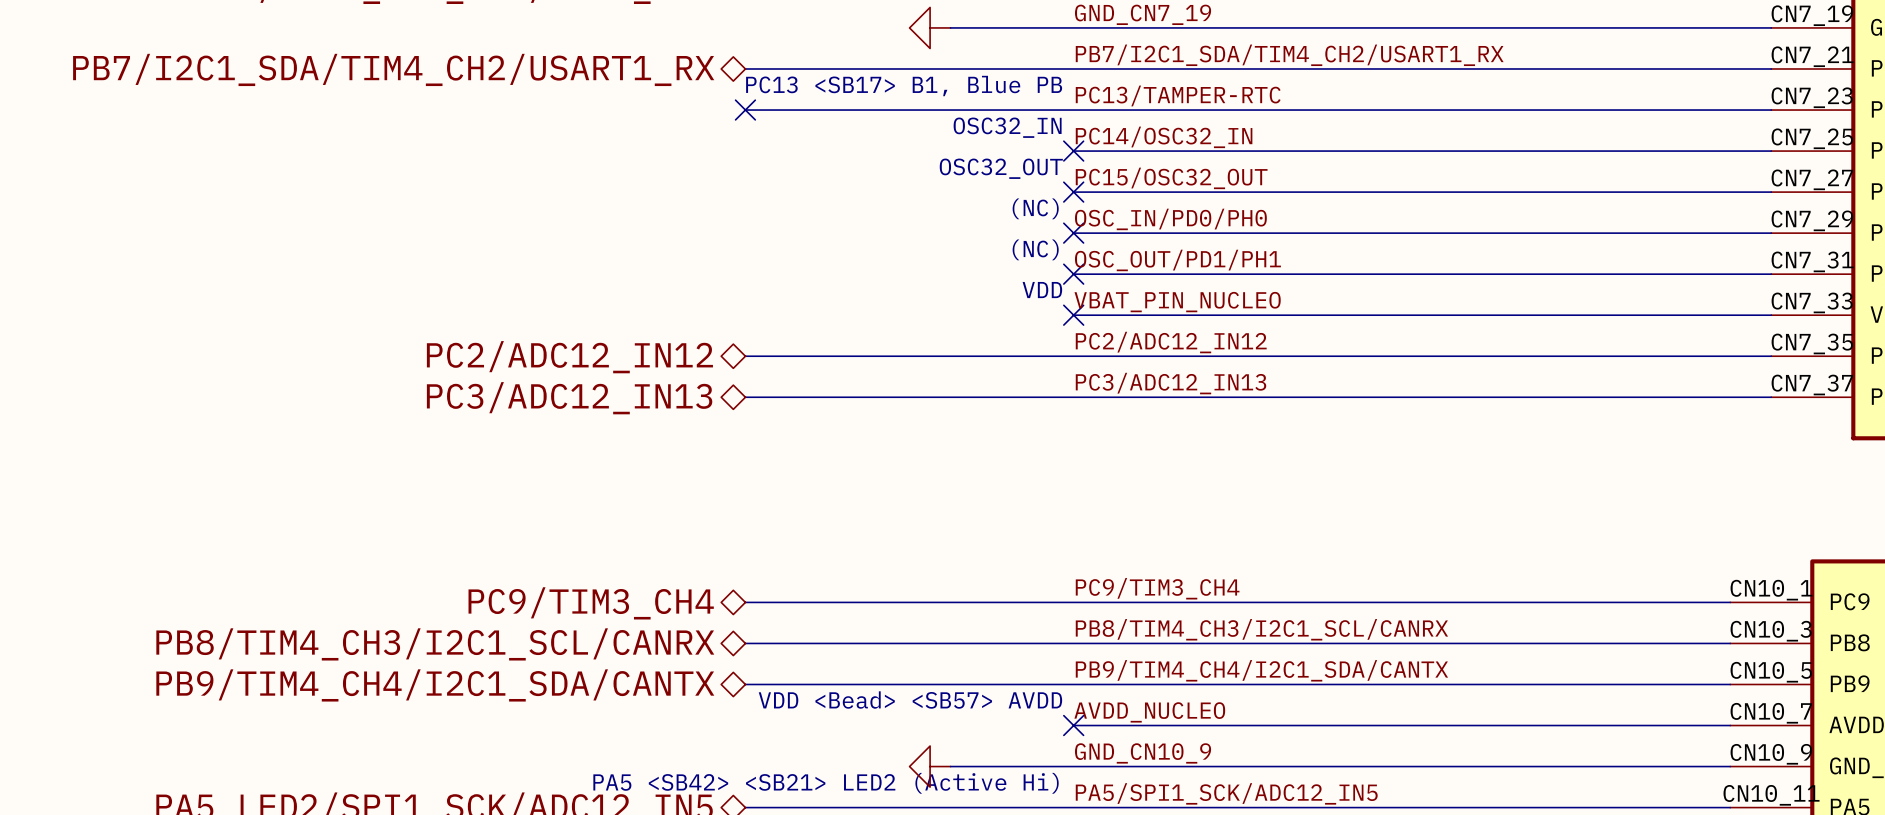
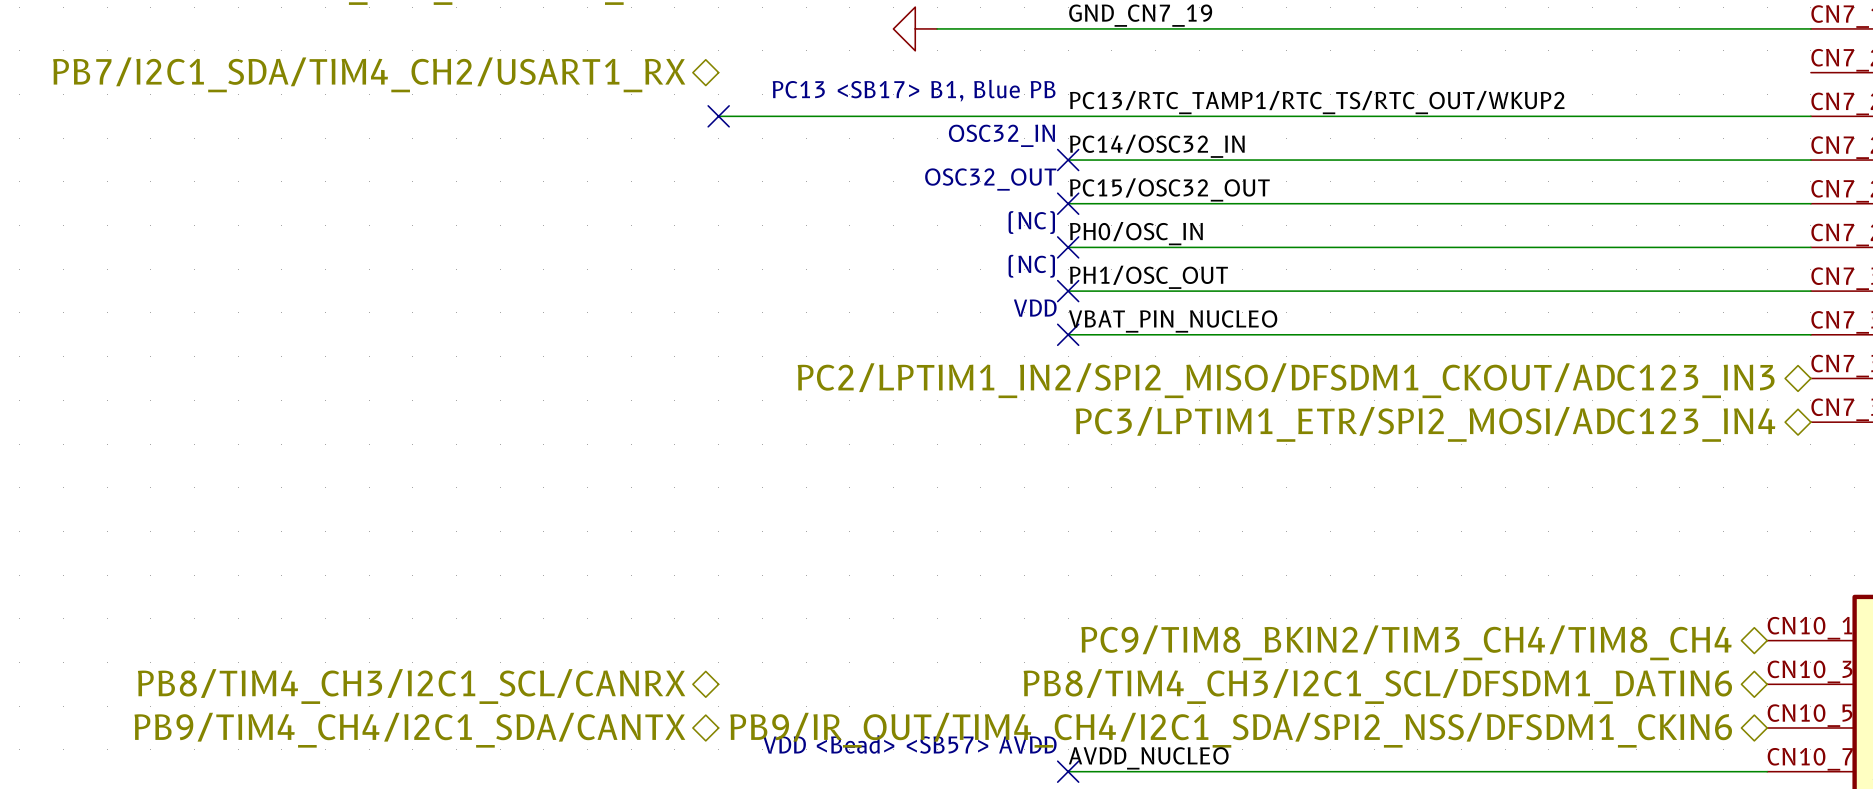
label: PB7/I2C1_SDA/TIM4_CH2/USART1_RX (1289, 55) -> none
wire: (745, 68) (1771, 68) -> none
label: PC13/TAMPER-RTC (1178, 95) -> PC13/RTC_TAMP1/RTC_TS/RTC_OUT/WKUP2 (1317, 102)
label: OSC_IN/PD0/PH0 (1170, 219) -> PH0/OSC_IN (1136, 233)
label: OSC_OUT/PD1/PH1 (1177, 260) -> PH1/OSC_OUT (1148, 277)
label: PC2/ADC12_IN12 (1171, 342) -> none
wire: (745, 356) (1771, 356) -> none
hierarchical label: PC2/ADC12_IN12 (569, 357) -> none
hierarchical label: none -> PC2/LPTIM1_IN2/SPI2_MISO/DFSDM1_CKOUT/ADC123_IN3 (1286, 380)
label: PC3/ADC12_IN13 (1171, 383) -> none
wire: (745, 397) (1771, 397) -> none
hierarchical label: PC3/ADC12_IN13 (569, 398) -> none
hierarchical label: none -> PC3/LPTIM1_ETR/SPI2_MOSI/ADC123_IN4 (1425, 424)
label: PC9/TIM3_CH4 (1157, 588) -> none
wire: (745, 602) (1730, 602) -> none
hierarchical label: PC9/TIM3_CH4 (591, 603) -> none
hierarchical label: none -> PC9/TIM8_BKIN2/TIM3_CH4/TIM8_CH4 (1406, 642)
label: PB8/TIM4_CH3/I2C1_SCL/CANRX (1261, 629) -> none
wire: (745, 643) (1730, 643) -> none
hierarchical label: none -> PB8/TIM4_CH3/I2C1_SCL/DFSDM1_DATIN6 (1377, 686)
label: PB9/TIM4_CH4/I2C1_SDA/CANTX (1261, 670) -> none
wire: (745, 684) (1730, 684) -> none
hierarchical label: none -> PB9/IR_OUT/TIM4_CH4/I2C1_SDA/SPI2_NSS/DFSDM1_CKIN6 (1231, 730)

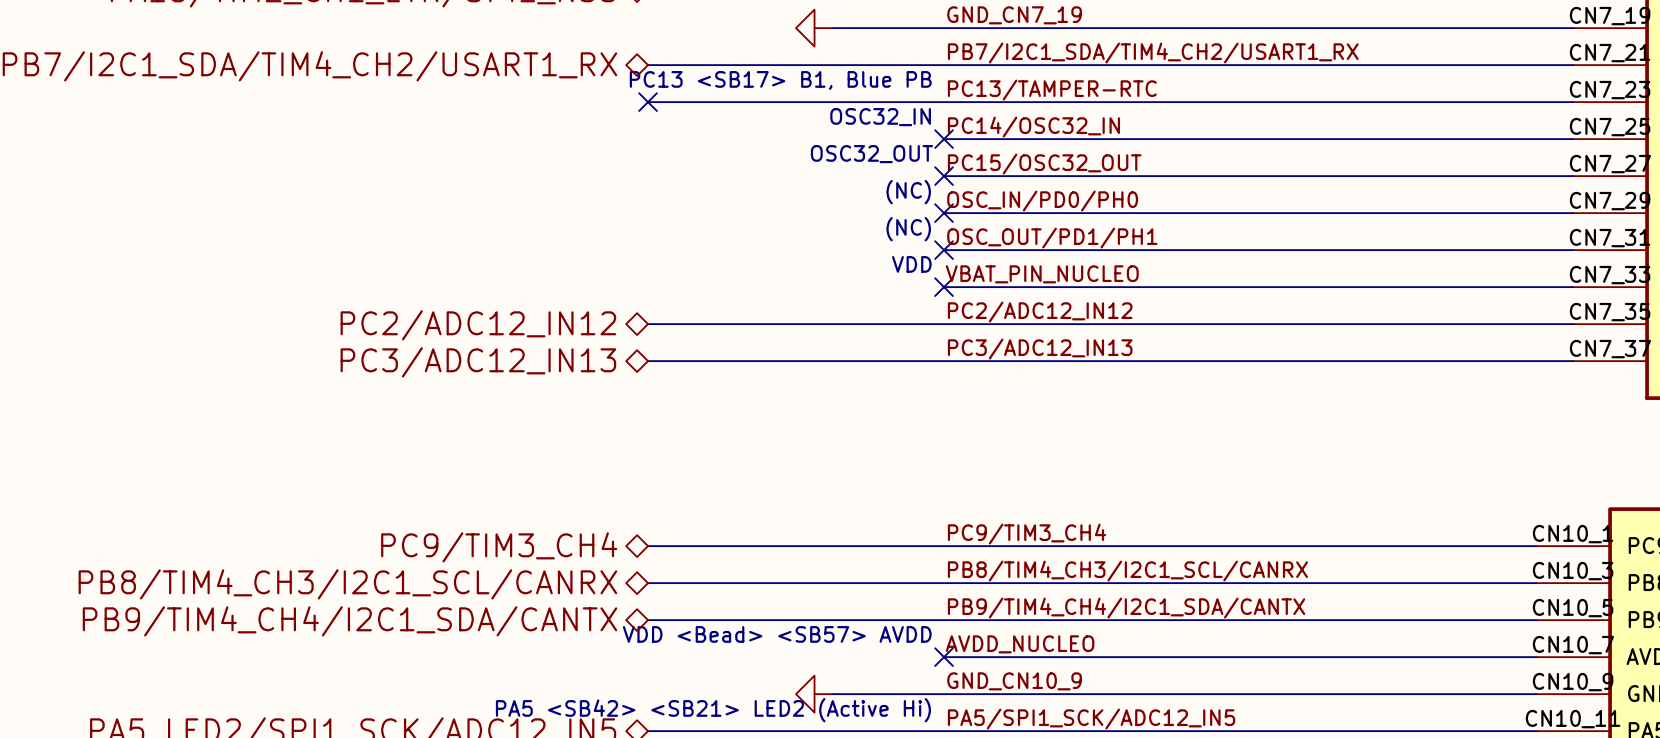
label: none -> PB7/I2C1_SDA/TIM4_CH2/USART1_RX (1153, 53)
wire: none -> (648, 65) (1573, 65)
label: PC13/RTC_TAMP1/RTC_TS/RTC_OUT/WKUP2 (1317, 102) -> PC13/TAMPER-RTC (1052, 90)
label: PH0/OSC_IN (1136, 233) -> OSC_IN/PD0/PH0 (1042, 201)
label: PH1/OSC_OUT (1148, 277) -> OSC_OUT/PD1/PH1 (1052, 238)
label: none -> PC2/ADC12_IN12 (1040, 312)
wire: none -> (648, 324) (1573, 324)
hierarchical label: none -> PC2/ADC12_IN12 (478, 325)
hierarchical label: PC2/LPTIM1_IN2/SPI2_MISO/DFSDM1_CKOUT/ADC123_IN3 (1286, 380) -> none
label: none -> PC3/ADC12_IN13 (1040, 349)
wire: none -> (648, 361) (1573, 361)
hierarchical label: none -> PC3/ADC12_IN13 (478, 362)
hierarchical label: PC3/LPTIM1_ETR/SPI2_MOSI/ADC123_IN4 (1425, 424) -> none
label: none -> PC9/TIM3_CH4 (1027, 534)
wire: none -> (648, 546) (1536, 546)
hierarchical label: none -> PC9/TIM3_CH4 (499, 547)
hierarchical label: PC9/TIM8_BKIN2/TIM3_CH4/TIM8_CH4 (1406, 642) -> none
label: none -> PB8/TIM4_CH3/I2C1_SCL/CANRX (1127, 571)
wire: none -> (648, 583) (1536, 583)
hierarchical label: PB8/TIM4_CH3/I2C1_SCL/DFSDM1_DATIN6 (1377, 686) -> none
label: none -> PB9/TIM4_CH4/I2C1_SDA/CANTX (1126, 608)
wire: none -> (648, 620) (1536, 620)
hierarchical label: PB9/IR_OUT/TIM4_CH4/I2C1_SDA/SPI2_NSS/DFSDM1_CKIN6 (1231, 730) -> none

